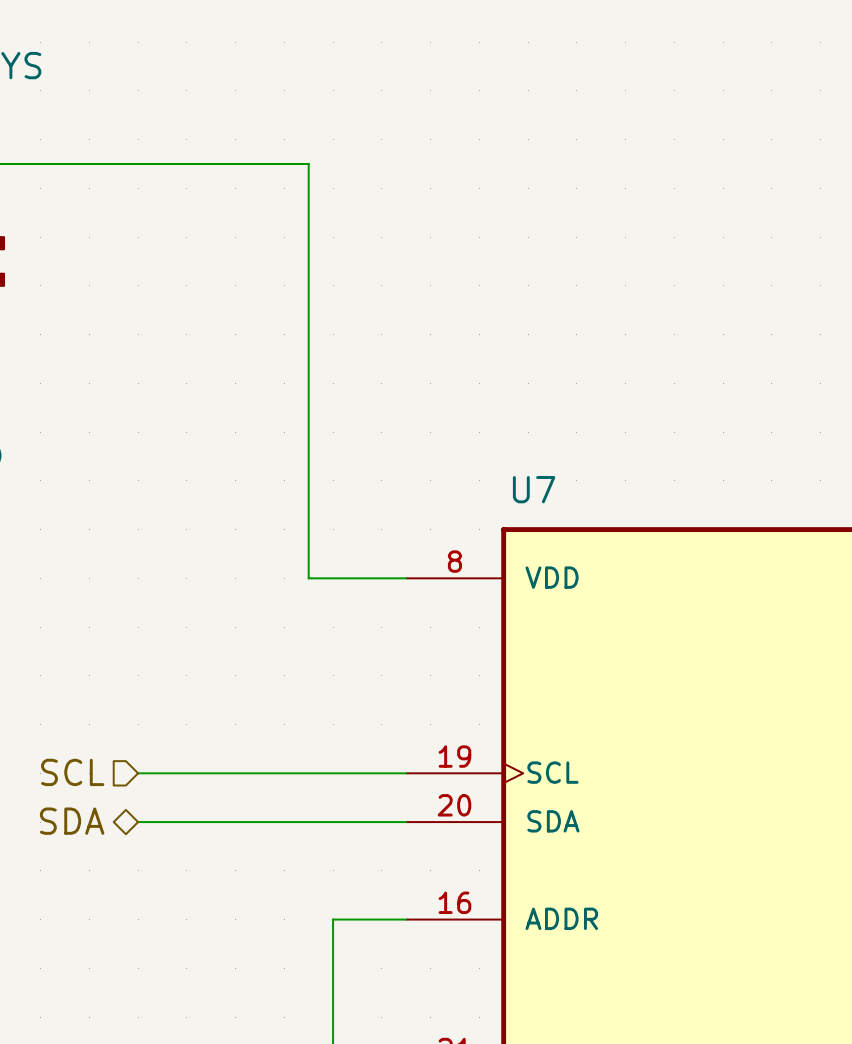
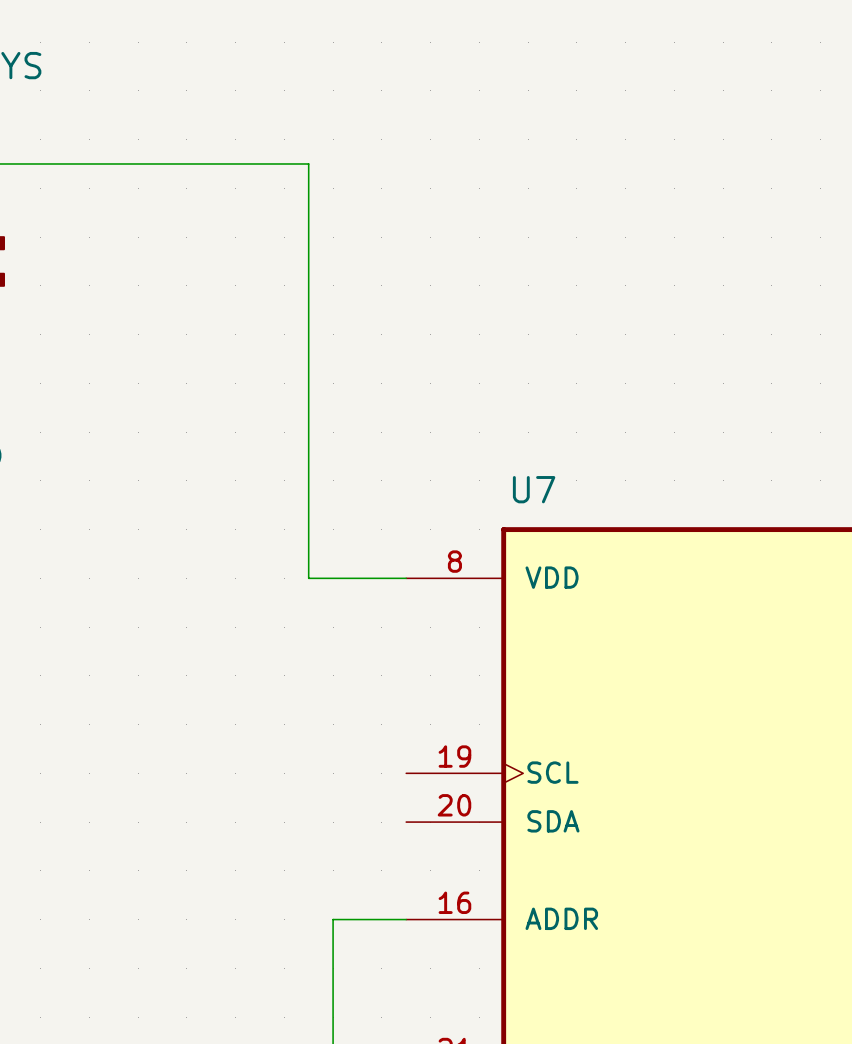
hierarchical label: SCL (72, 772) -> none
wire: (138, 773) (406, 773) -> none
hierarchical label: SDA (72, 821) -> none
wire: (138, 822) (406, 822) -> none

